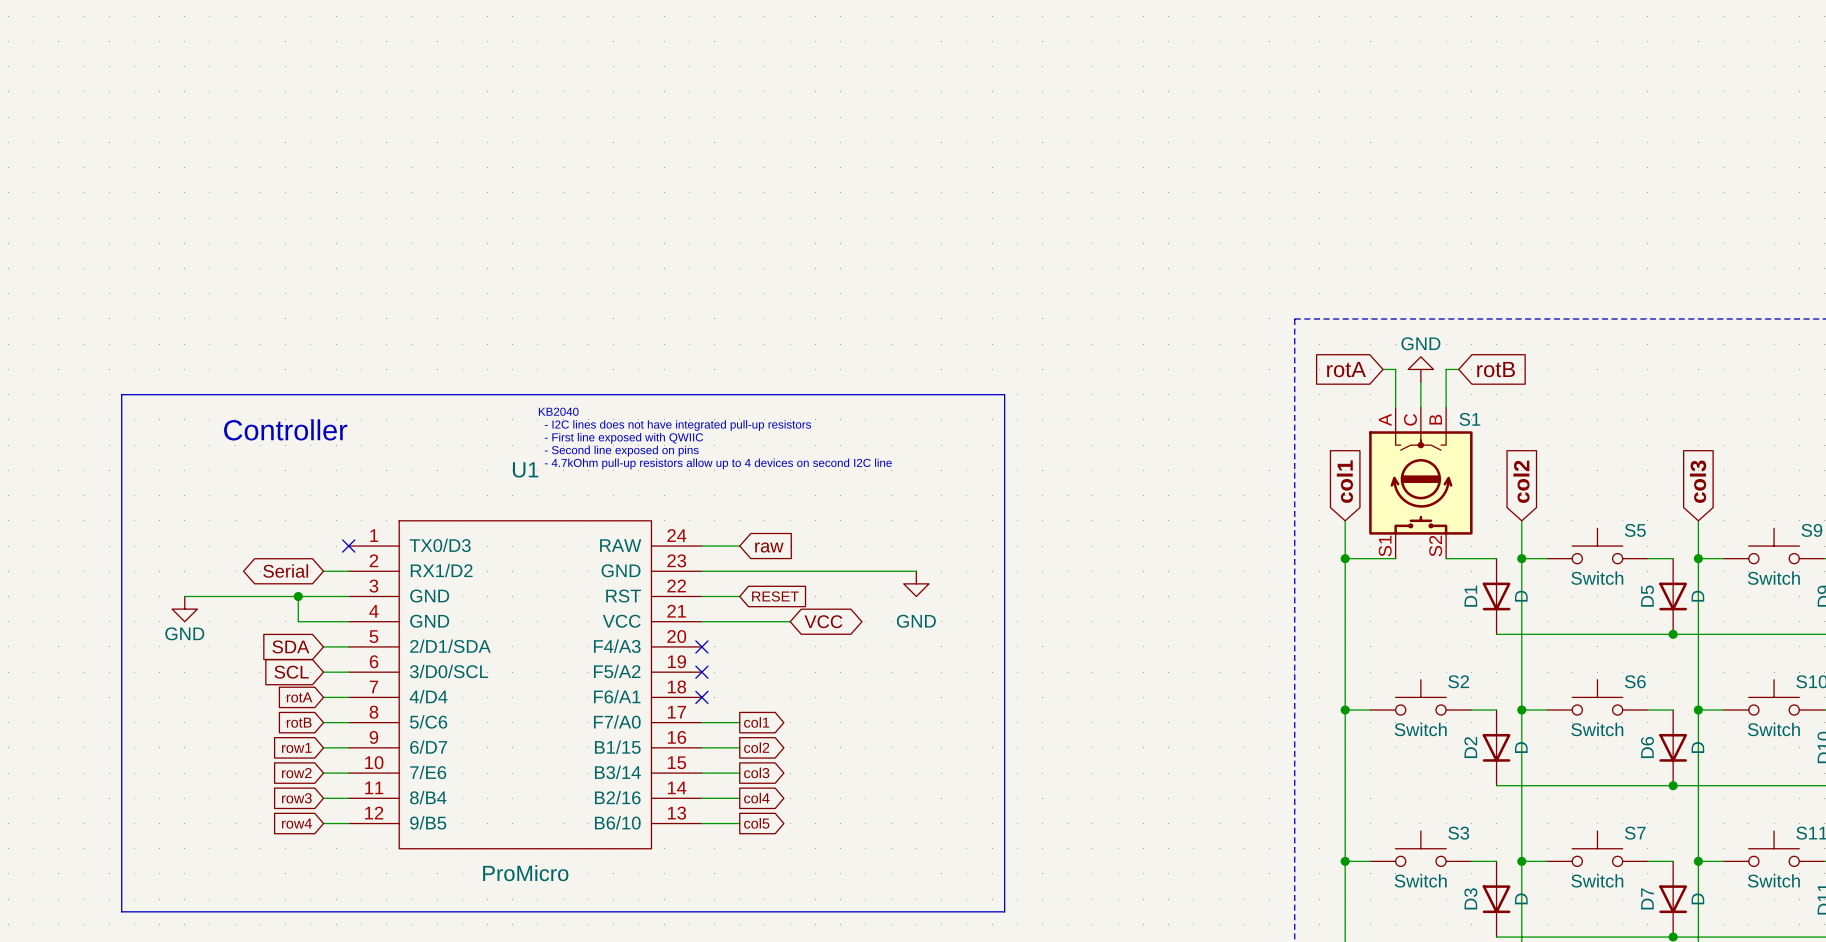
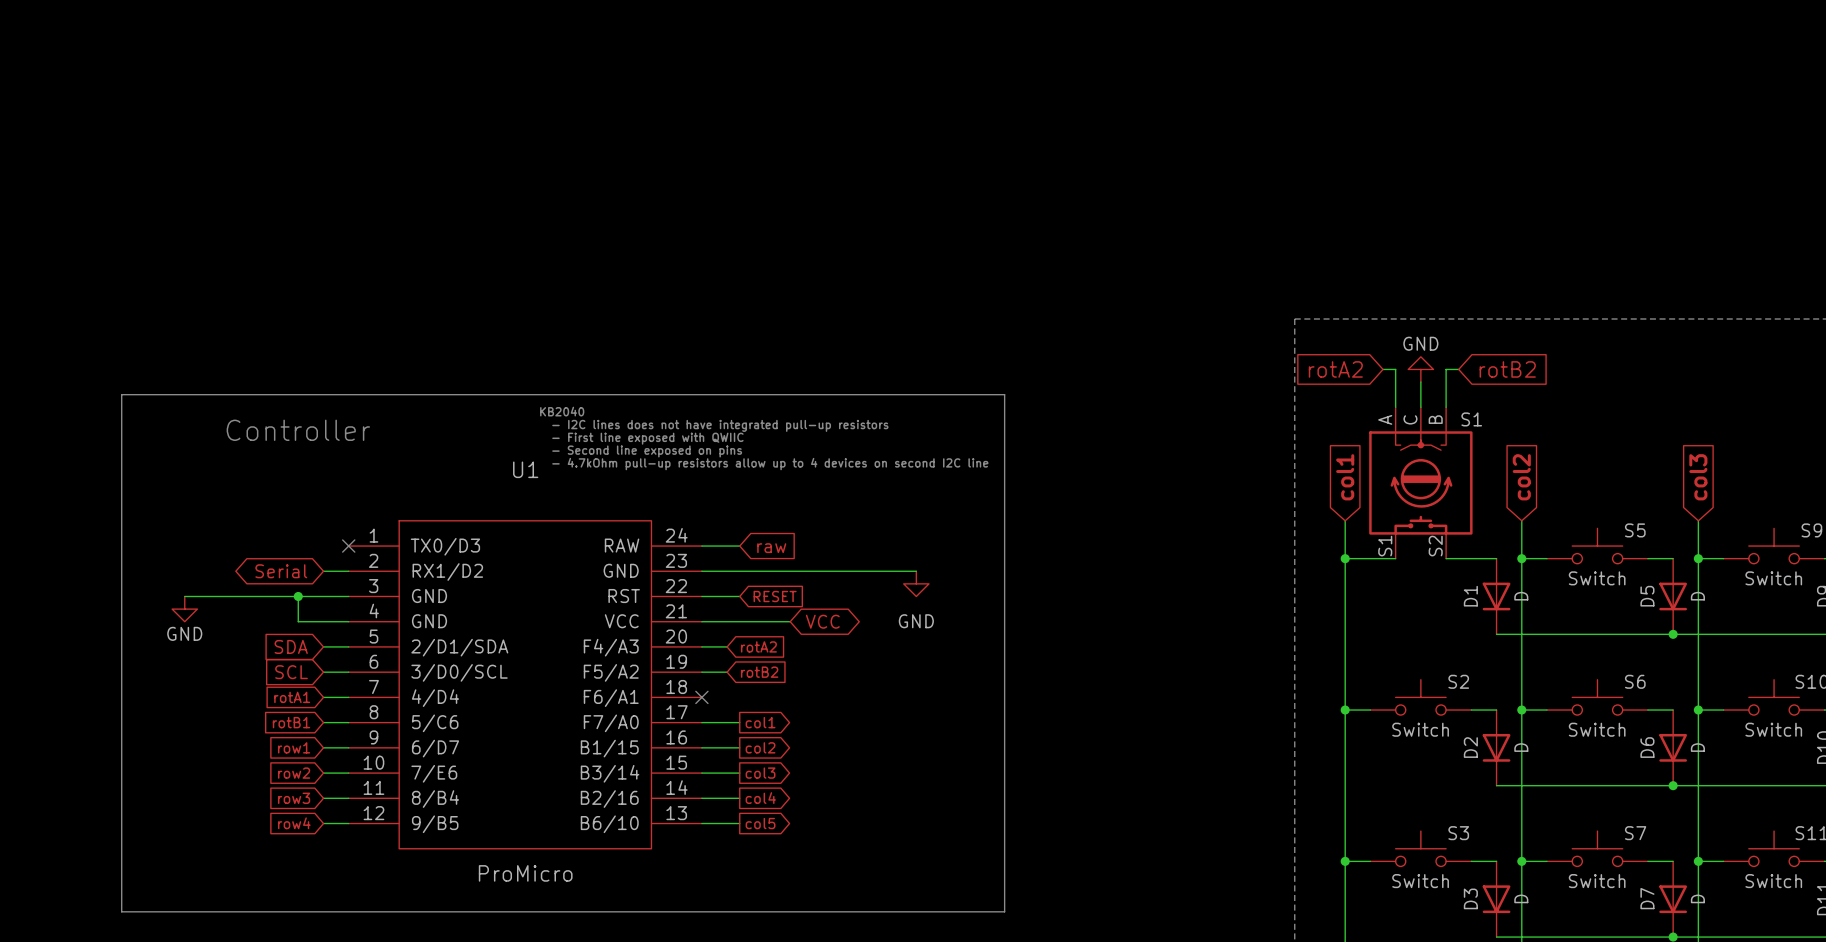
global label: rotA (1346, 369) -> rotA2 (1335, 369)
global label: rotB (1496, 369) -> rotB2 (1507, 369)
wire: none -> (701, 646) (727, 646)
no-connect mark: (701, 646) -> none
global label: none -> rotA2 (758, 646)
wire: none -> (701, 672) (727, 672)
no-connect mark: (701, 672) -> none
global label: none -> rotB2 (759, 672)
global label: rotA (299, 697) -> rotA1 (292, 697)
global label: rotB (299, 722) -> rotB1 (291, 722)

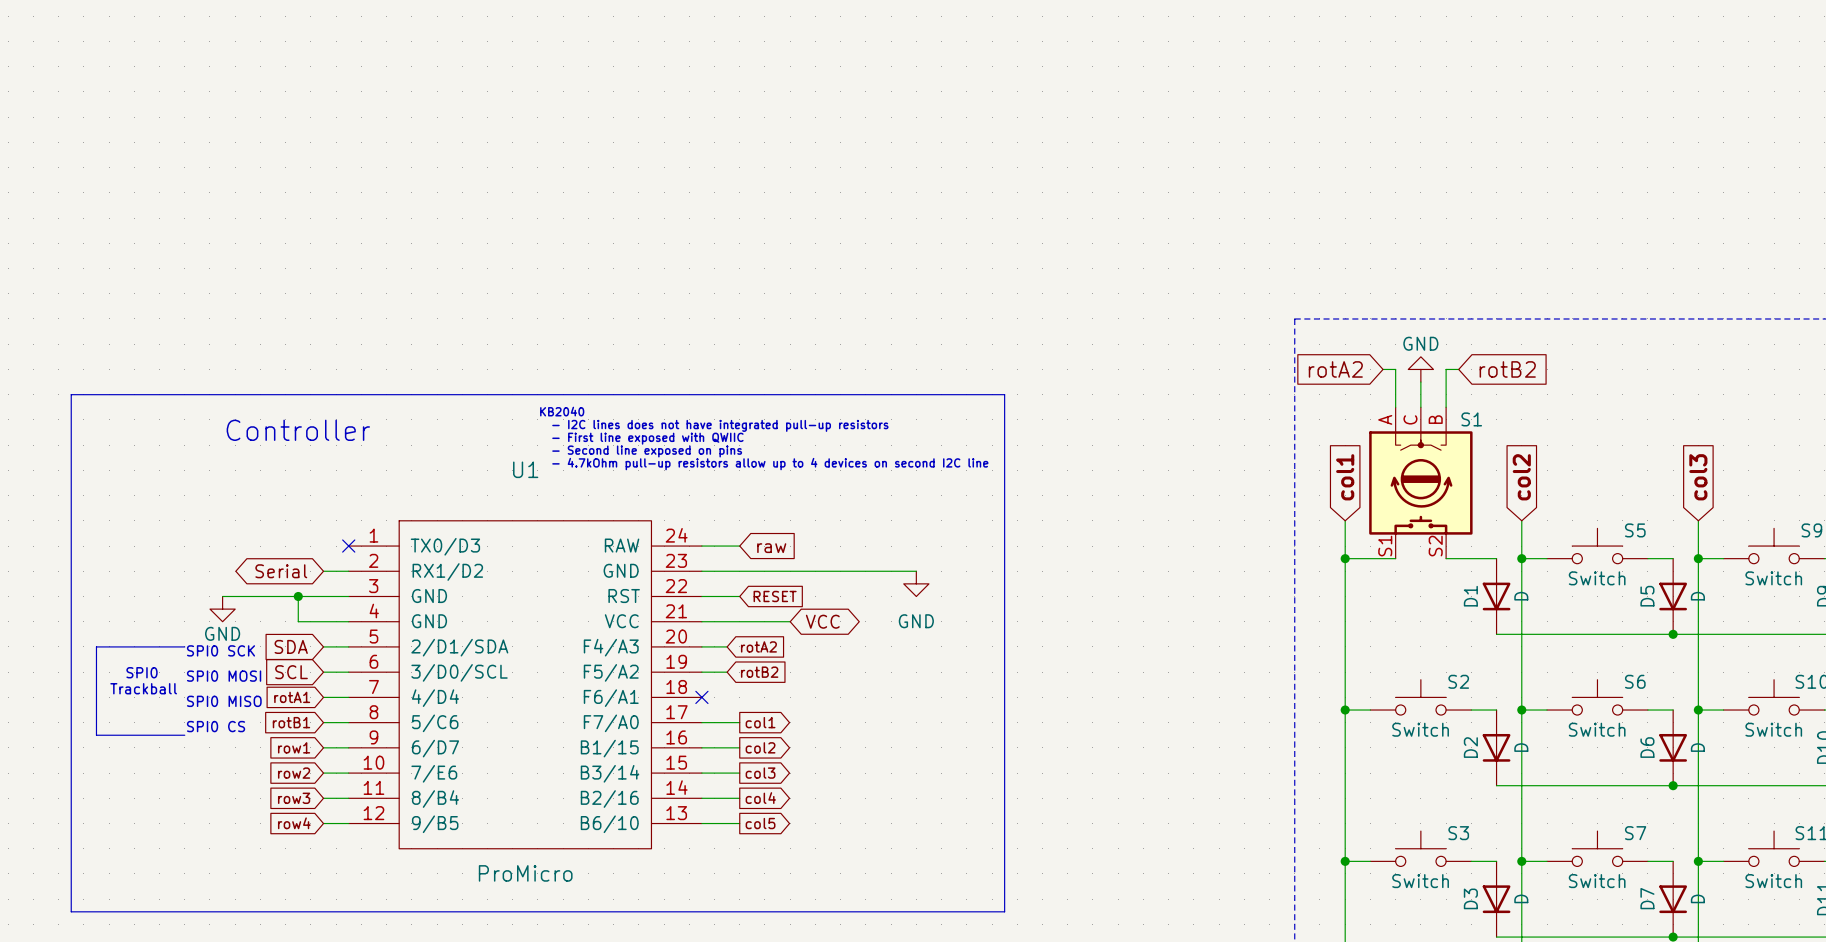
line: (121, 394) (121, 911) -> (121, 394) (71, 394) (71, 911) (121, 911)
wire: (184, 596) (222, 596) -> none
power symbol position: GND (184, 609) -> GND (222, 609)
line: none -> (184, 646) (96, 646) (96, 735) (184, 735)
text: none -> SPI0 SCK (220, 650)
text: none -> SPI0 (142, 672)
text: none -> SPI0 MOSI (224, 676)
text: none -> Trackball (143, 688)
text: none -> SPI0 MISO (224, 701)
text: none -> SPI0 CS (216, 726)

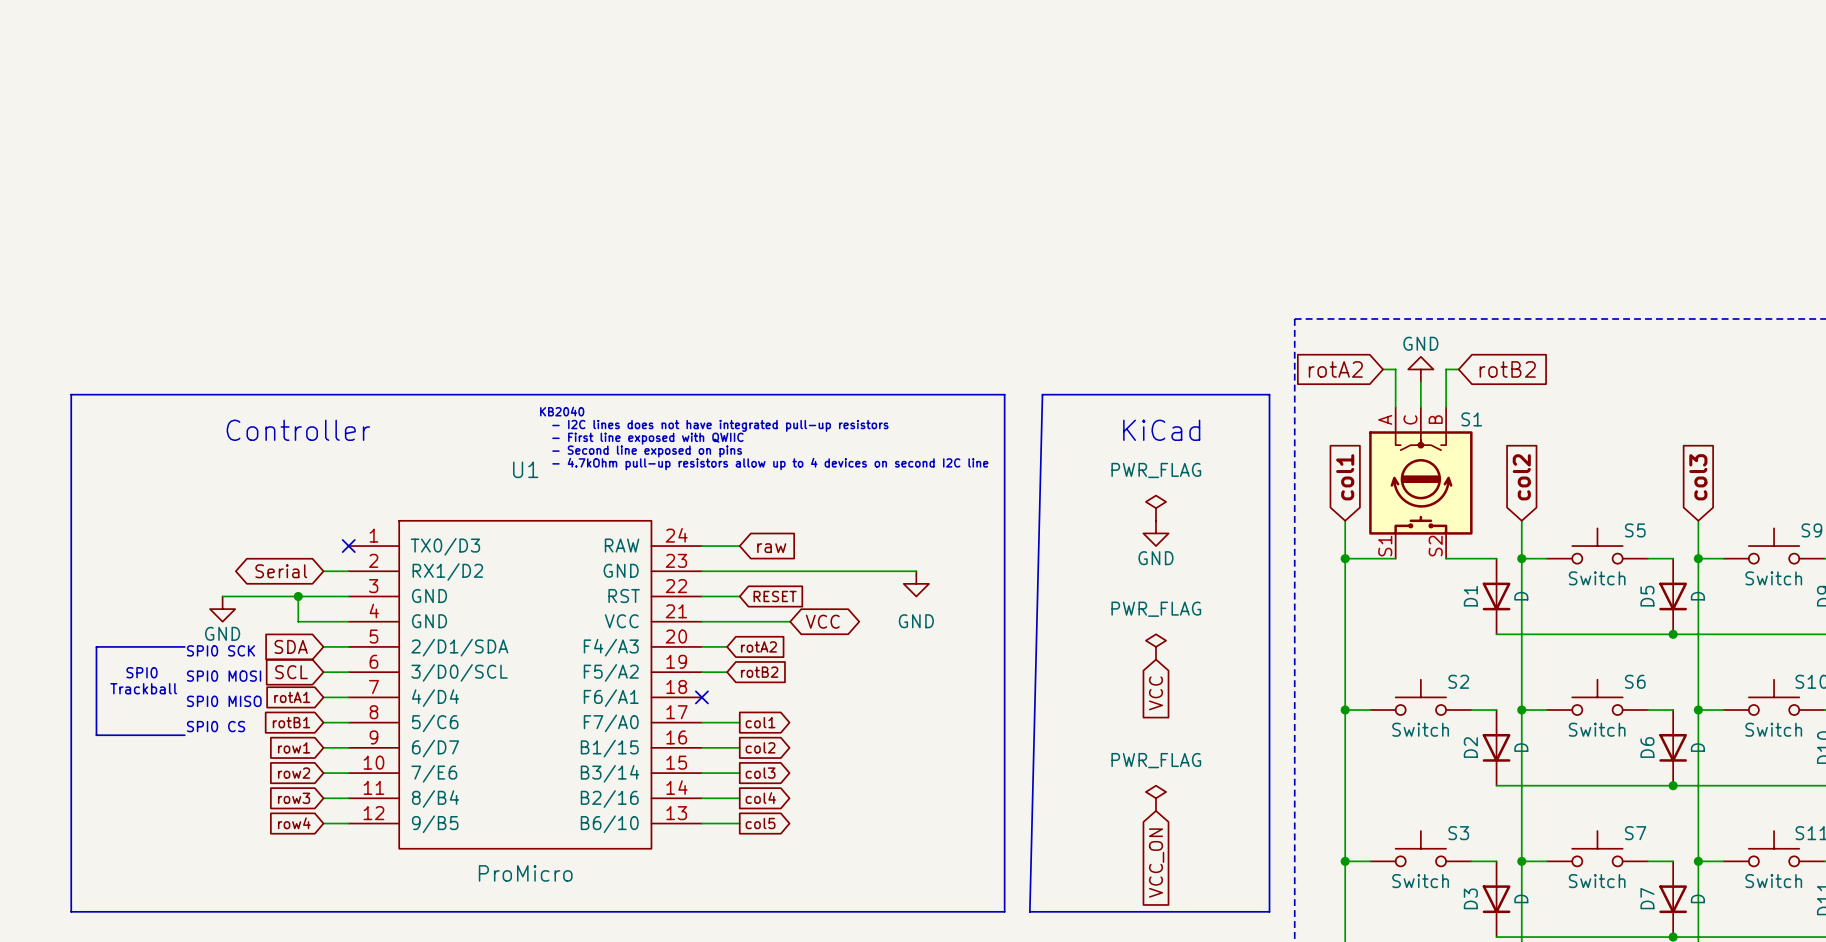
line: none -> (1042, 394) (1269, 394) (1269, 911) (1029, 911) (1042, 394)
text: none -> KiCad (1161, 430)
power symbol: none -> PWR_FLAG (1155, 508)
power symbol: none -> GND (1155, 533)
power symbol: none -> PWR_FLAG (1155, 646)
global label: none -> VCC (1155, 693)
power symbol: none -> PWR_FLAG (1155, 798)
global label: none -> VCC_ON (1156, 863)

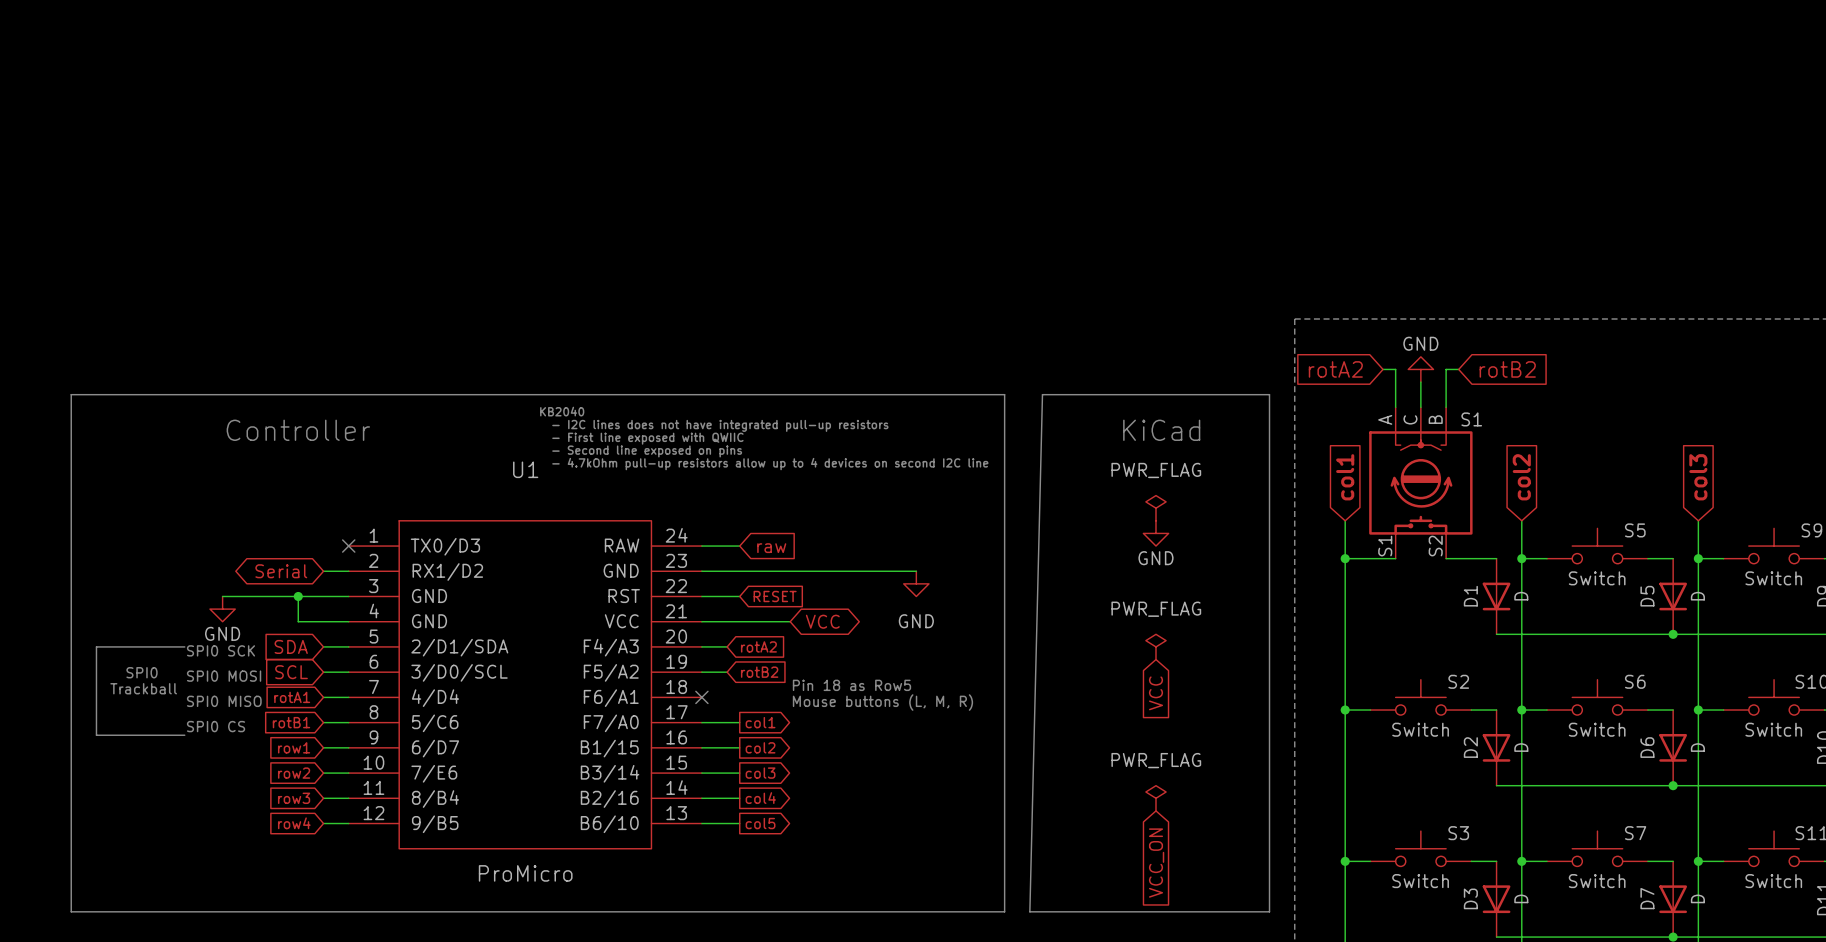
text: none -> Pin 18 as Row5 (851, 685)
text: none -> Mouse buttons (L, M, R) (882, 702)

